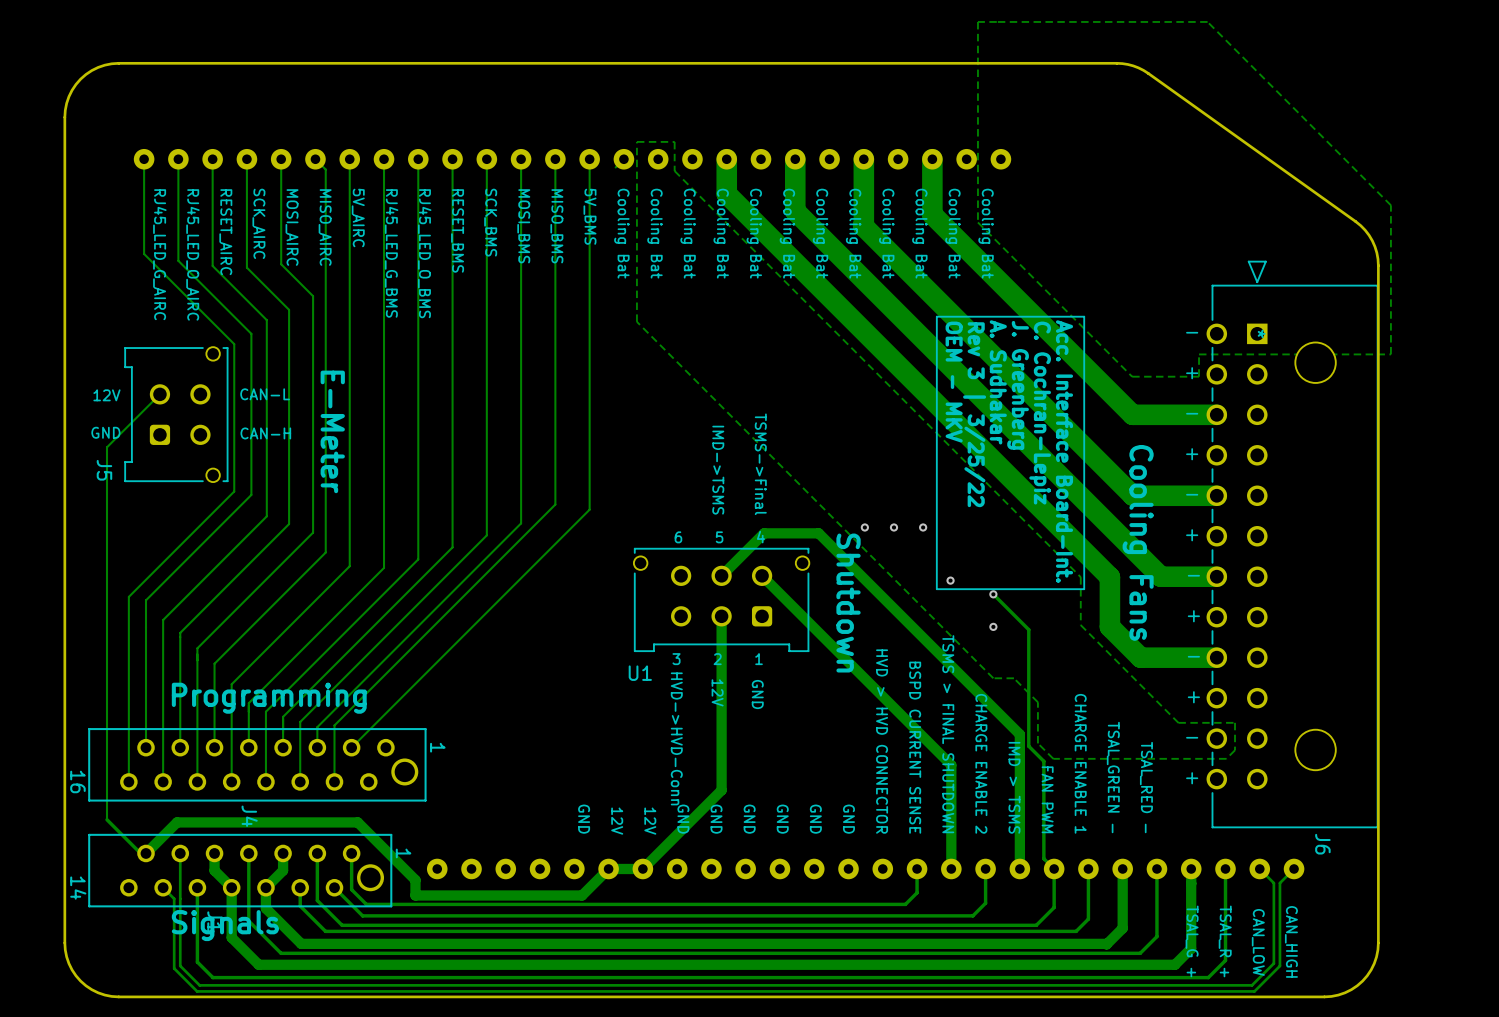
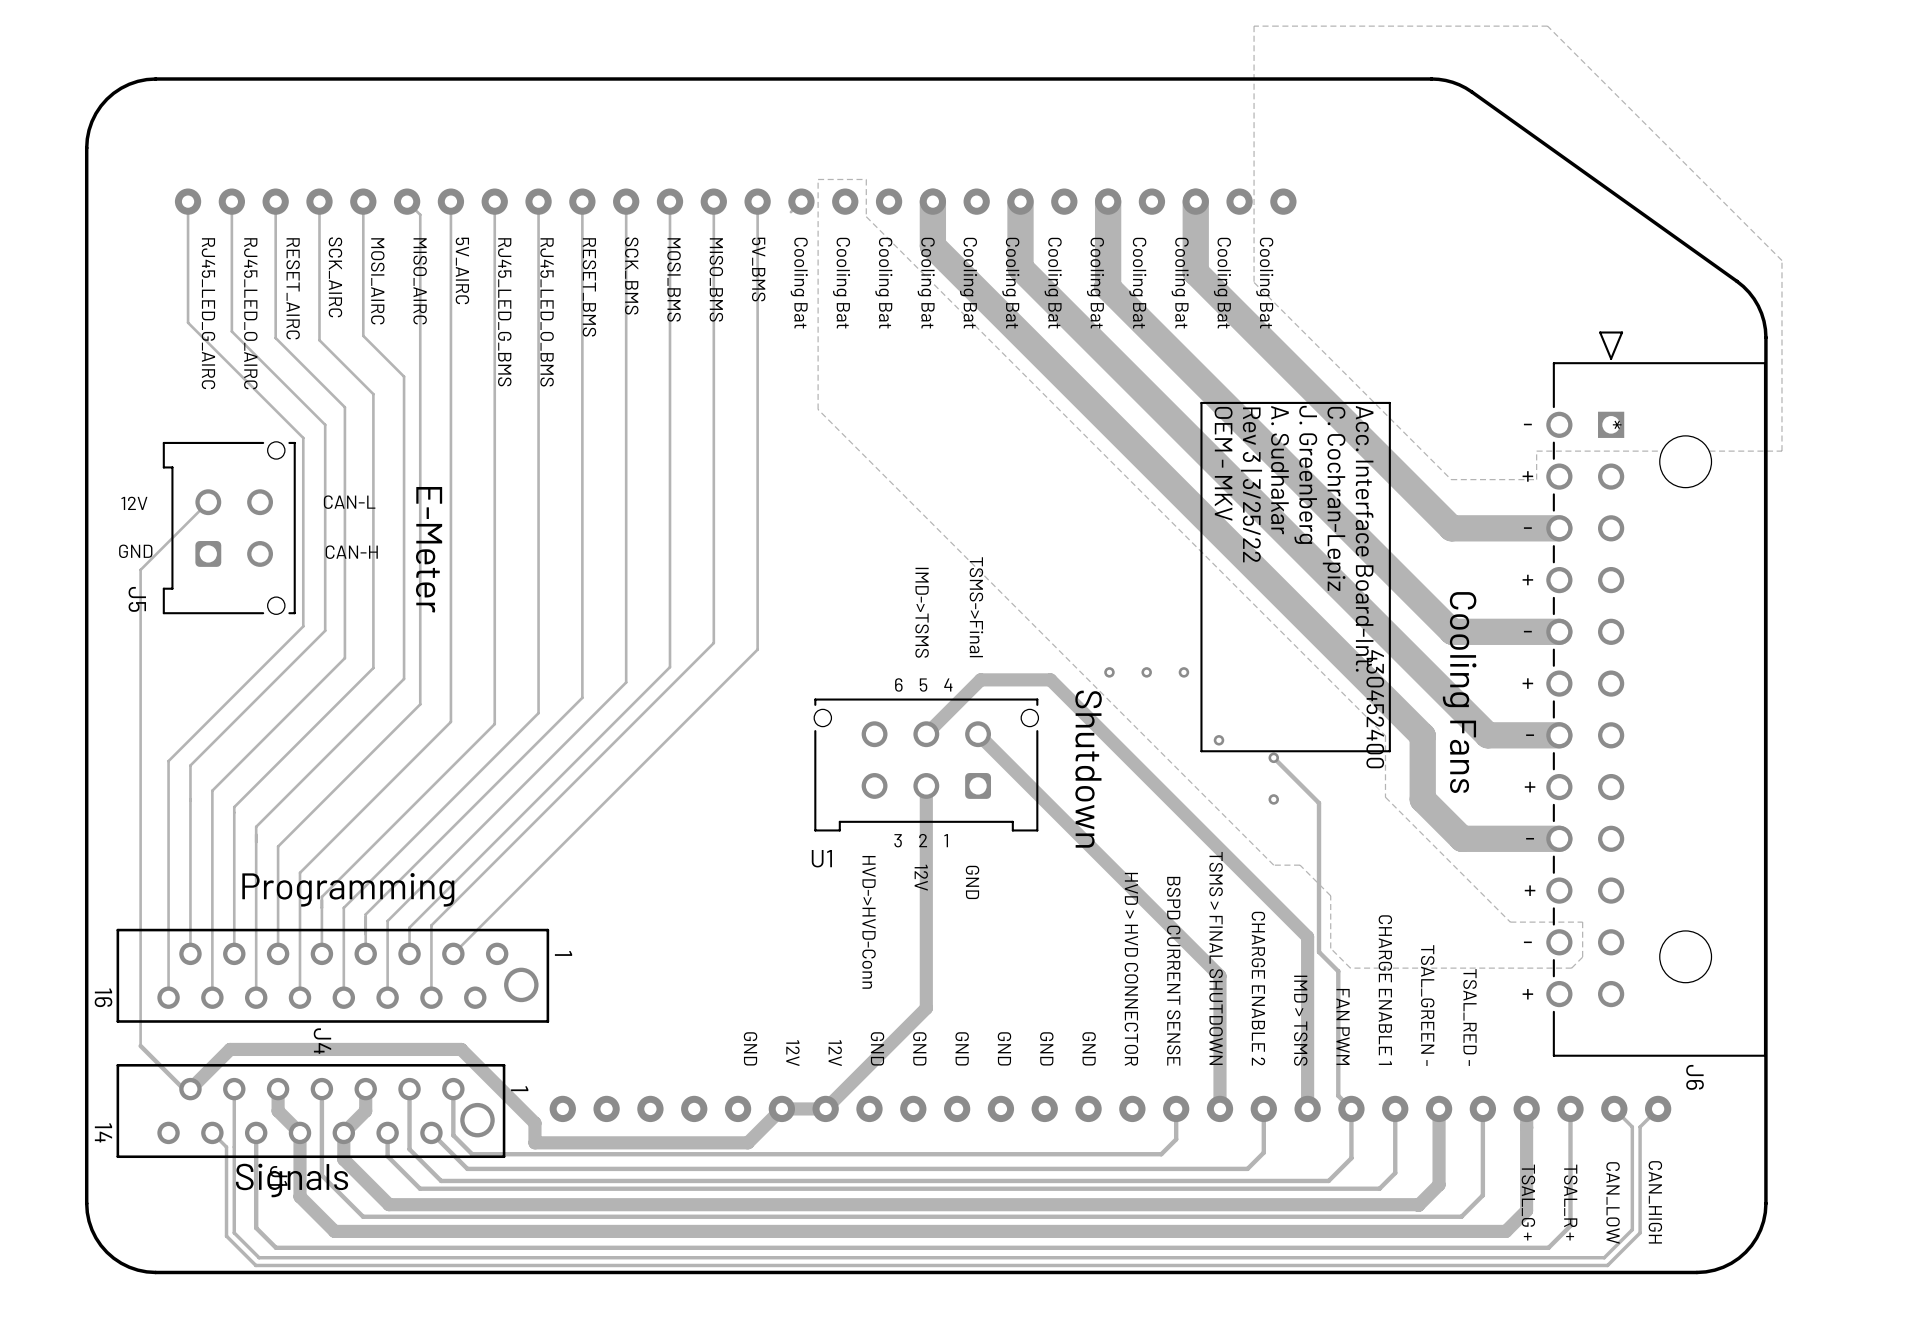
J6 text: none -> 430452400 (1375, 709)

